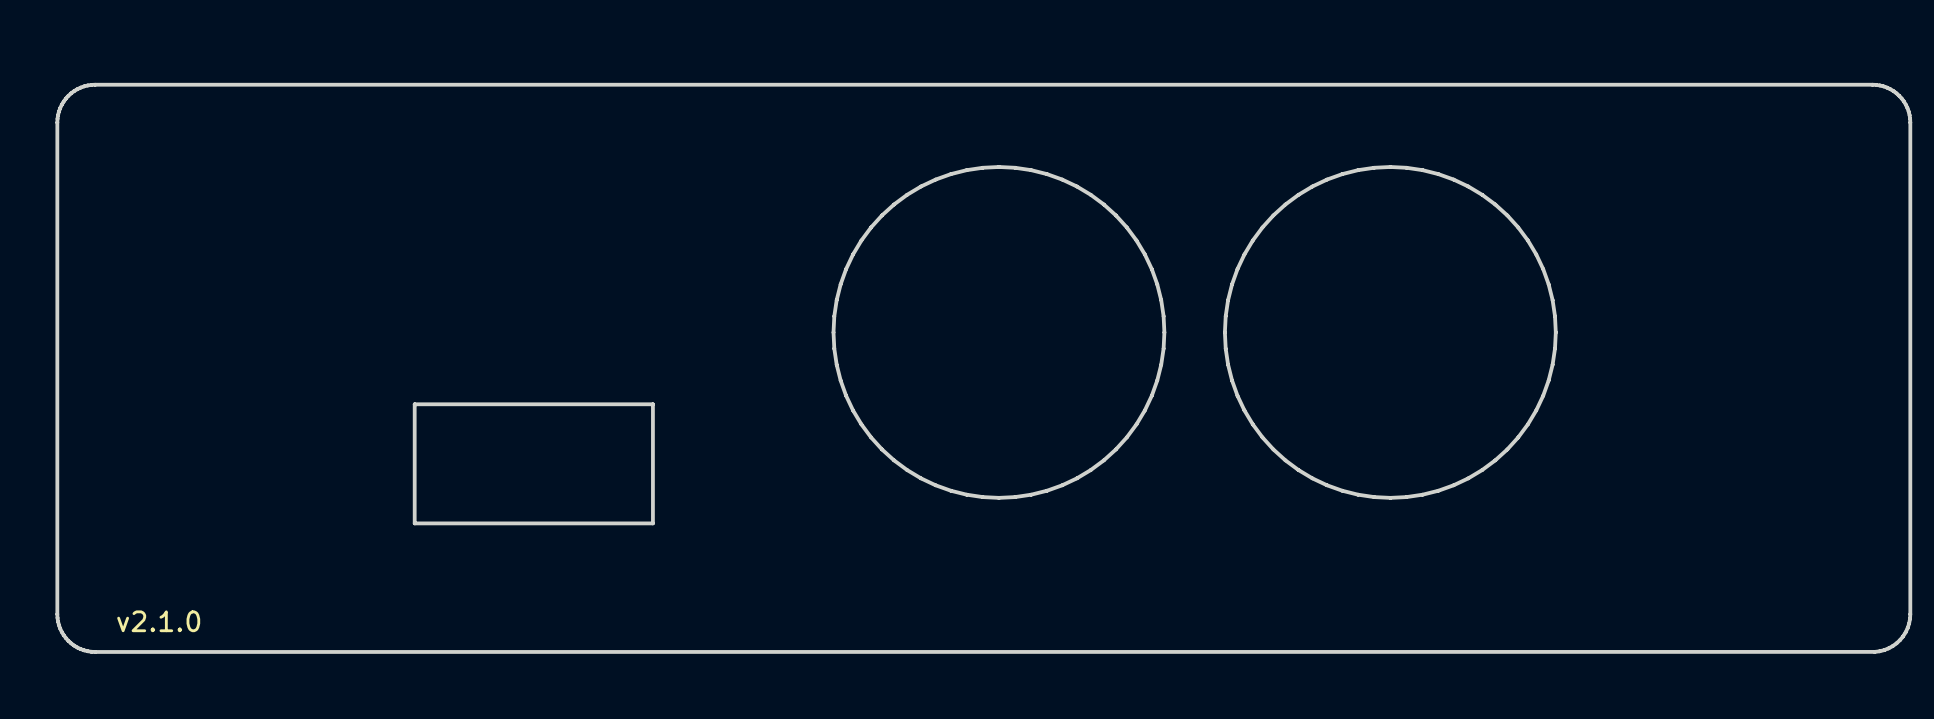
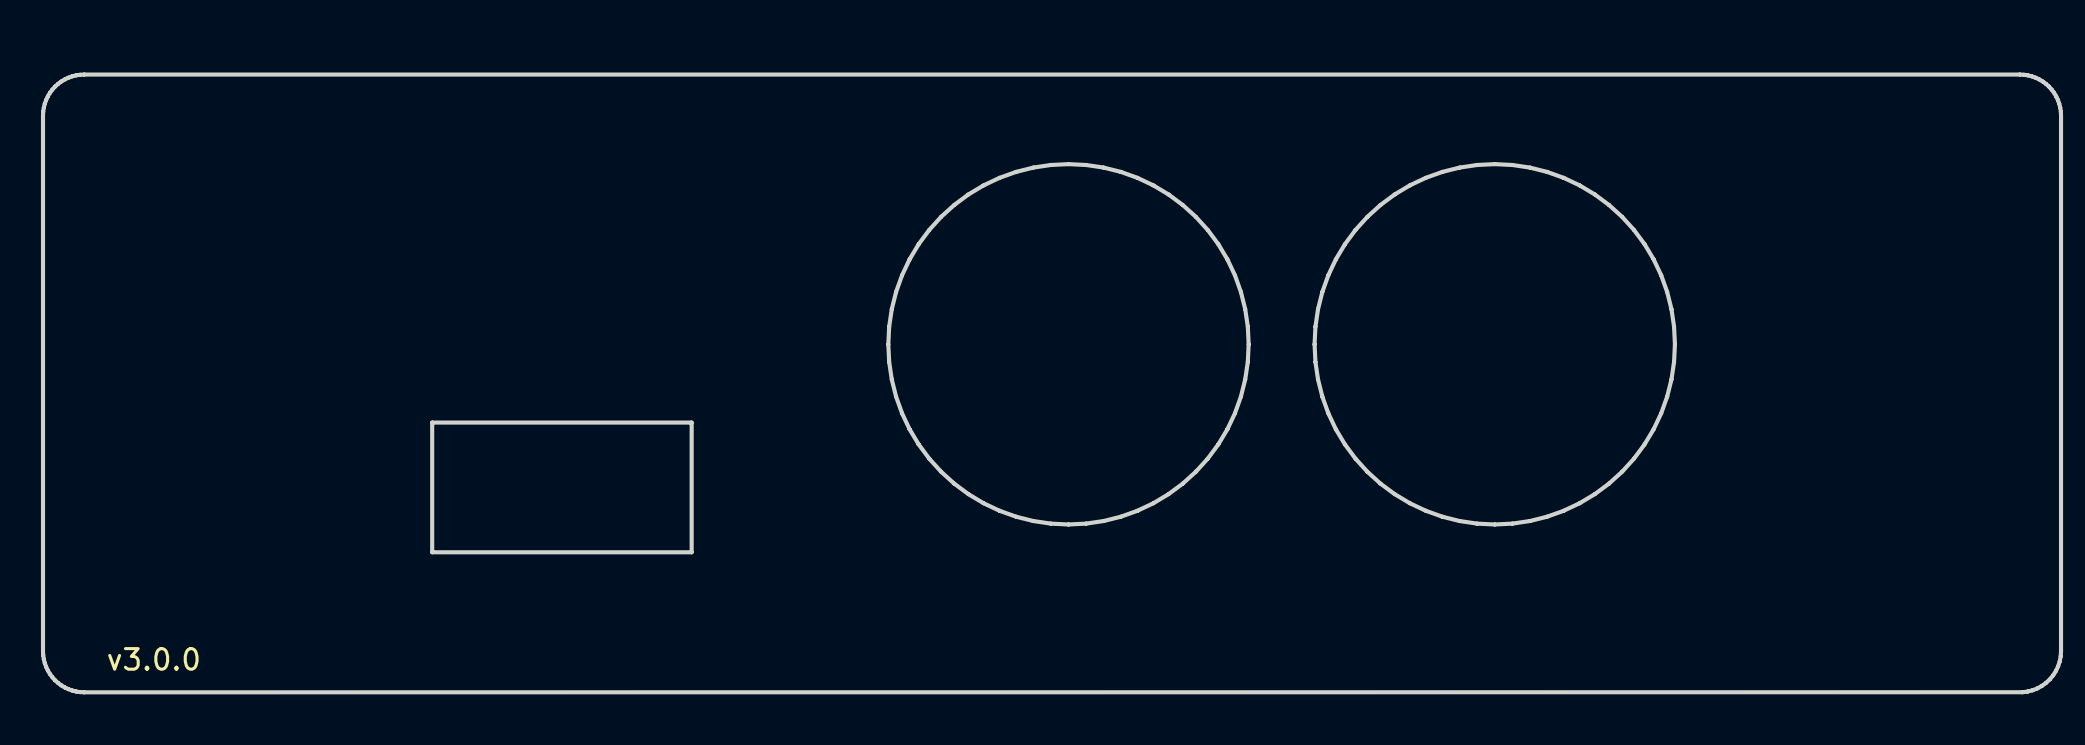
text: v2.1.0 (158, 621) -> v3.0.0 (153, 658)

